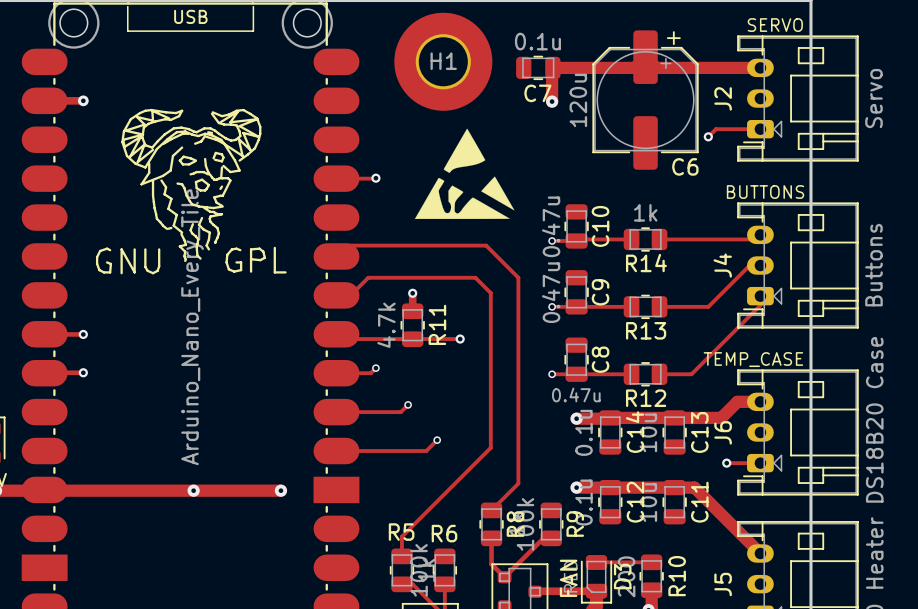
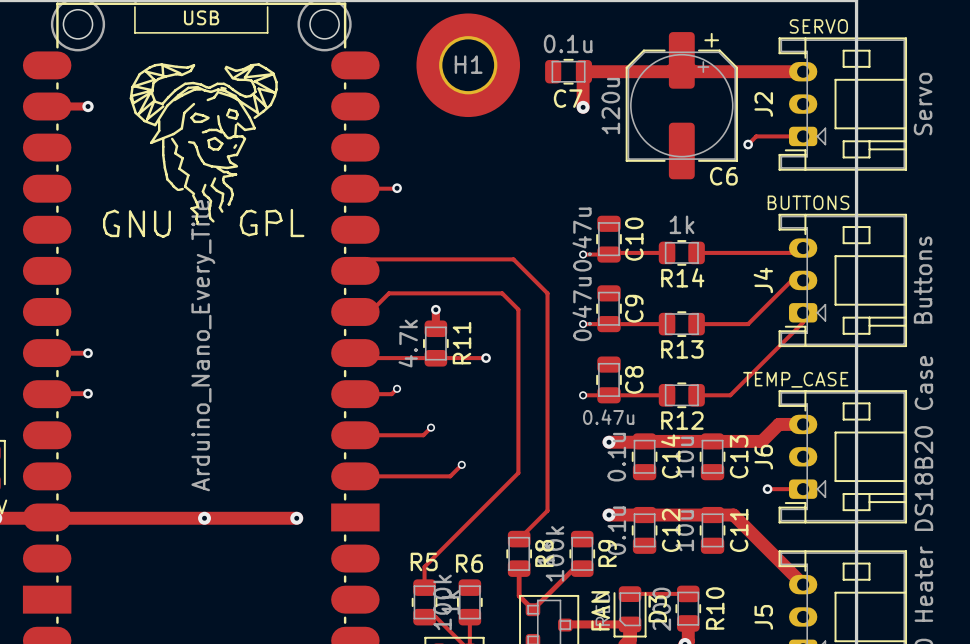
drawing: [414, 128, 515, 219] -> none
drawing position: (191, 191) -> (203, 150)

